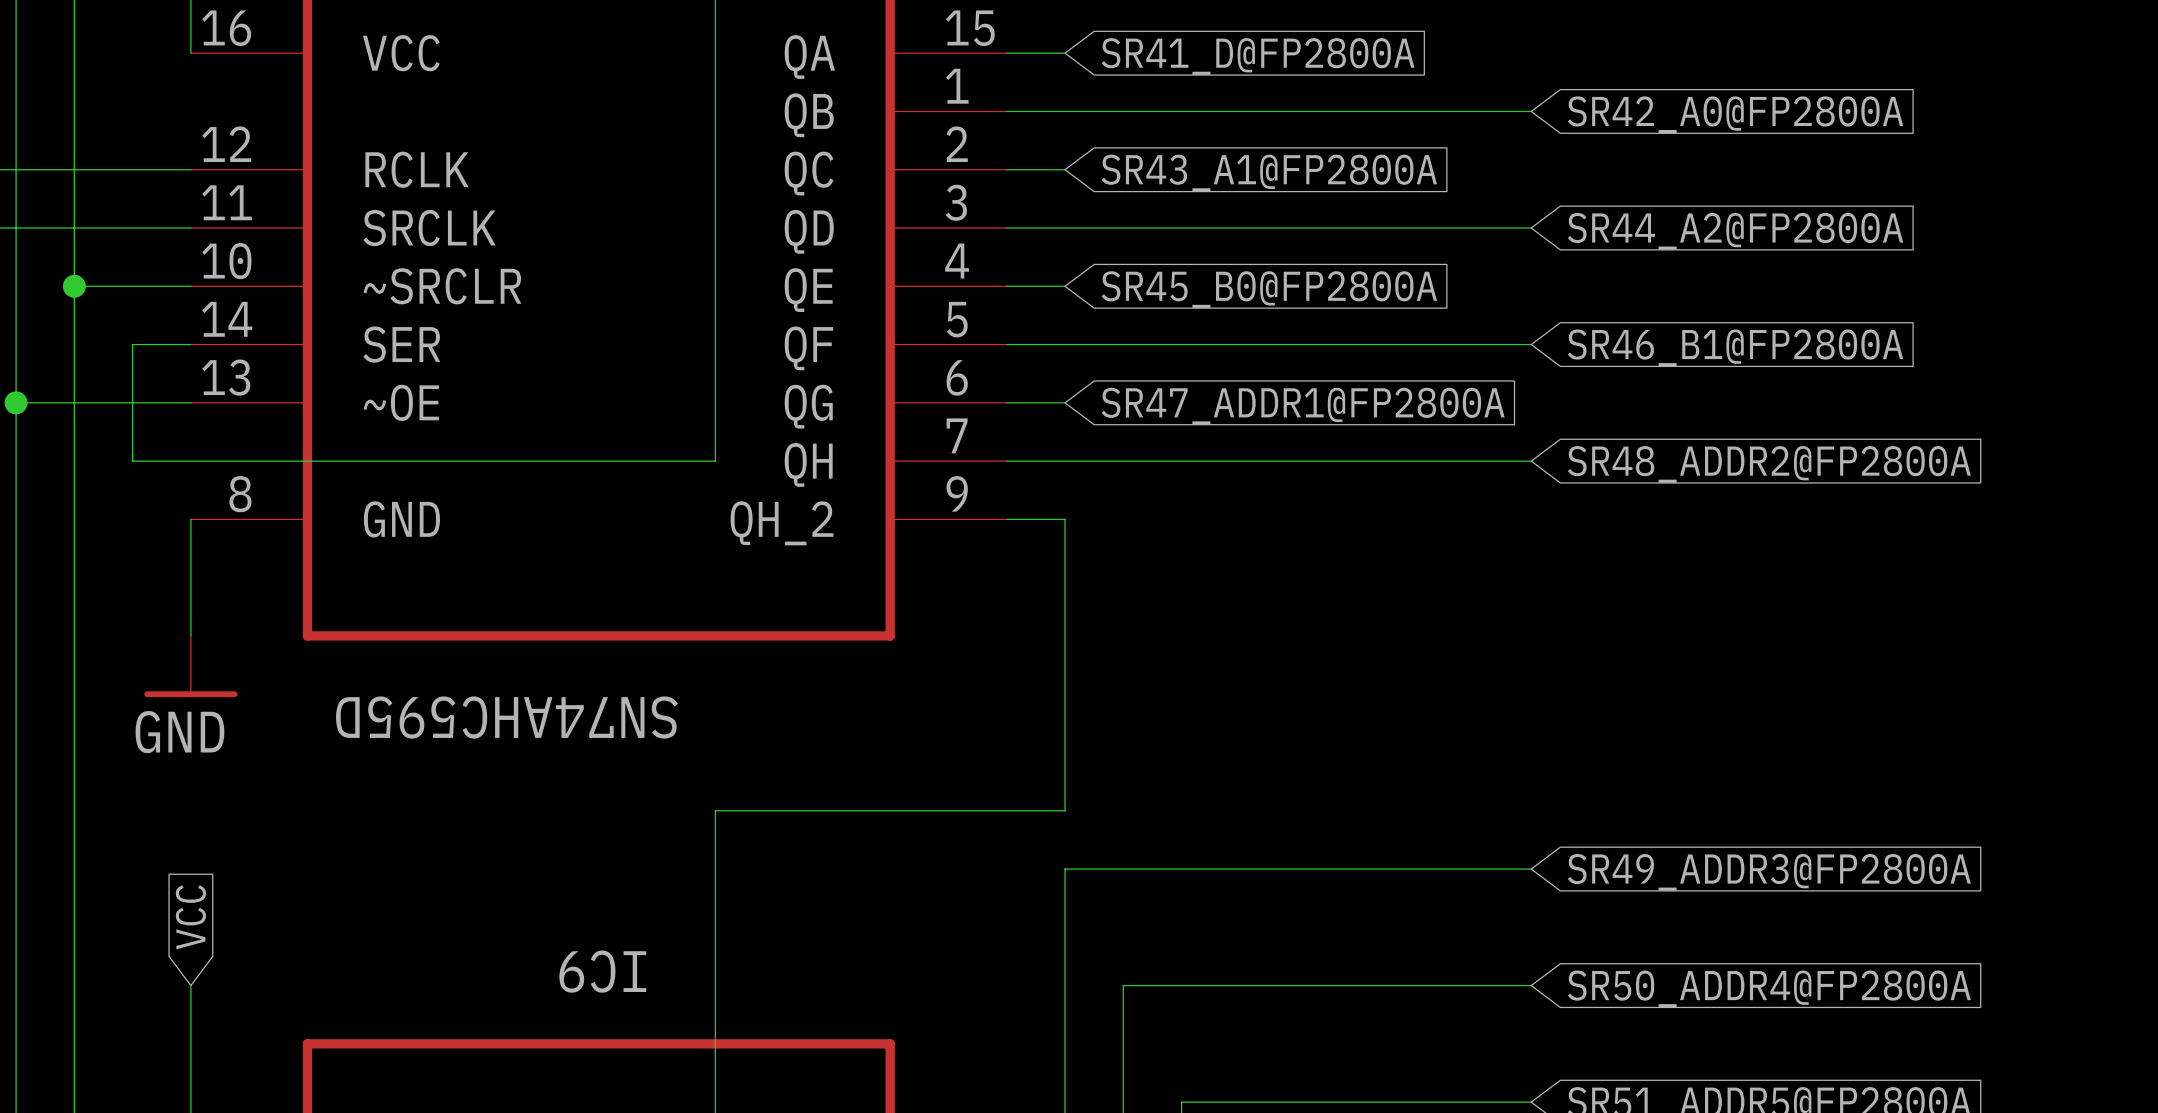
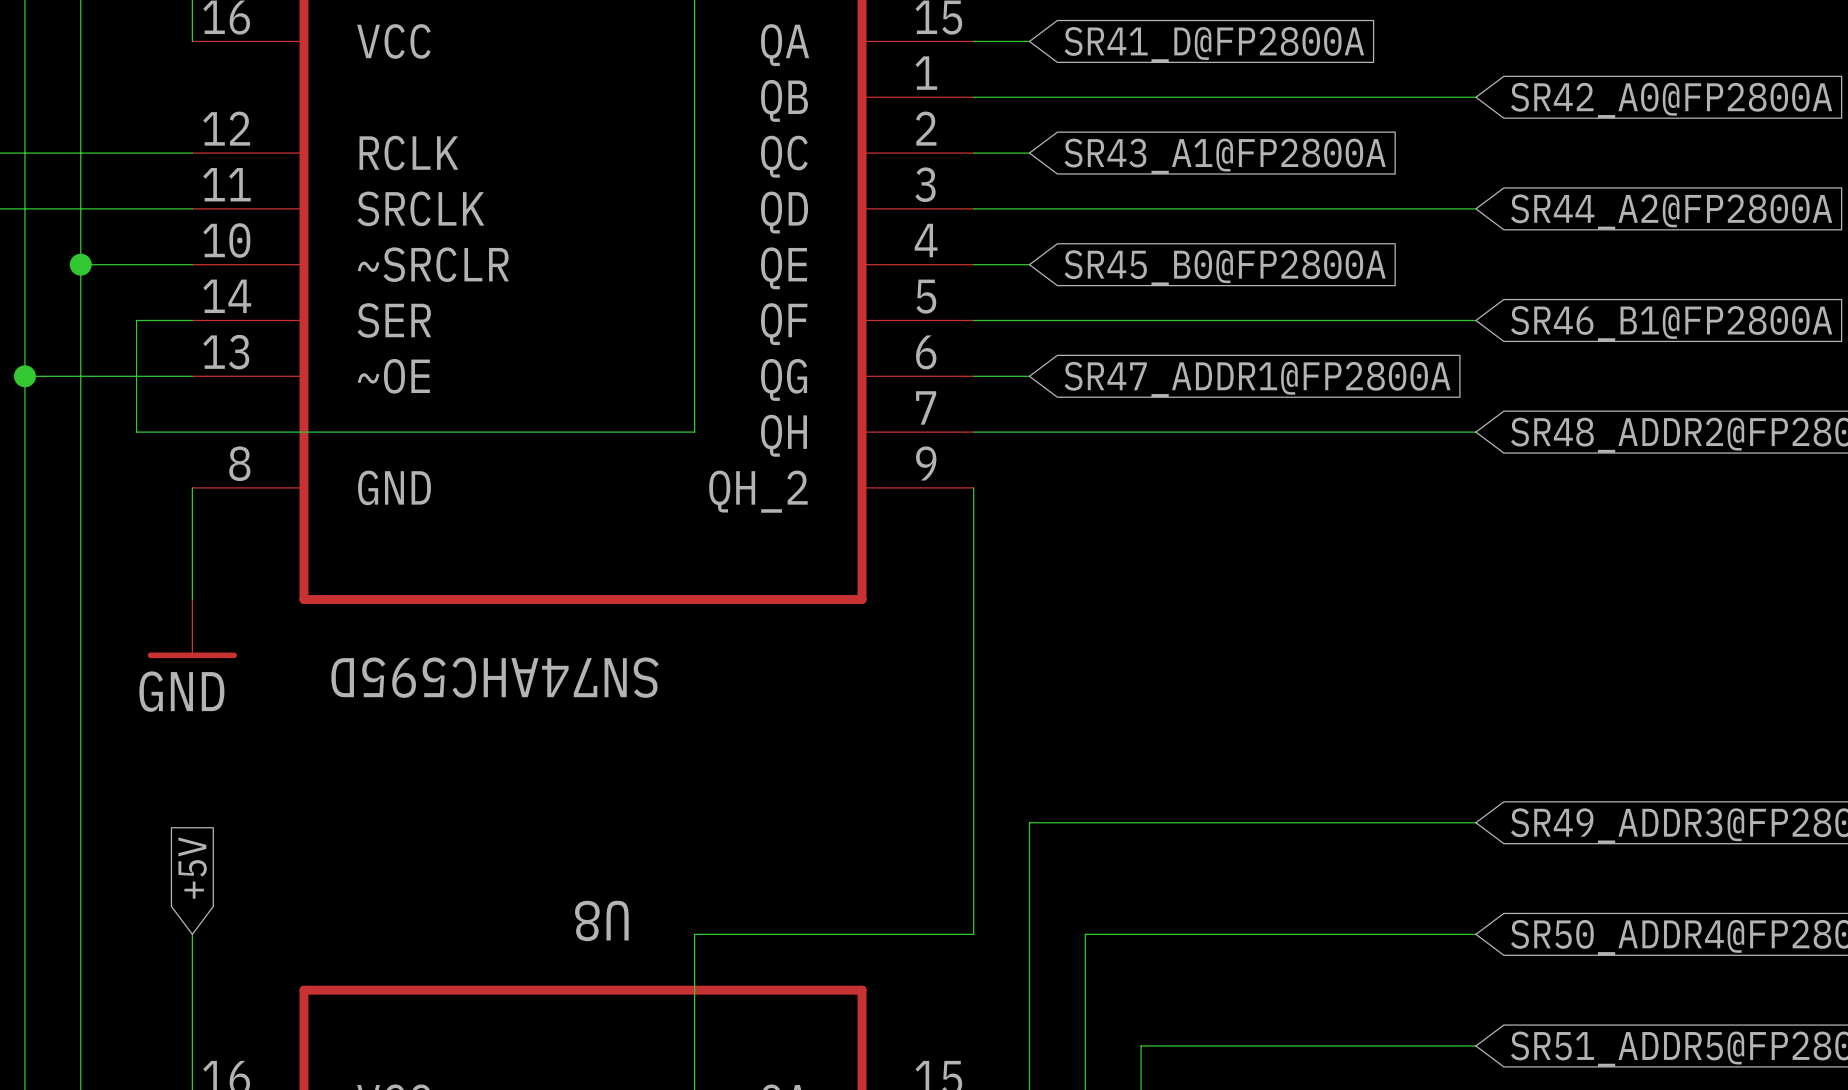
wire: (1006, 519) (1065, 519) (1065, 810) (715, 810) (715, 985) -> (973, 487) (973, 934) (694, 934)
global label: VCC (190, 917) -> +5V (192, 868)
IC9 name: IC9 (602, 971) -> U8 (601, 920)

